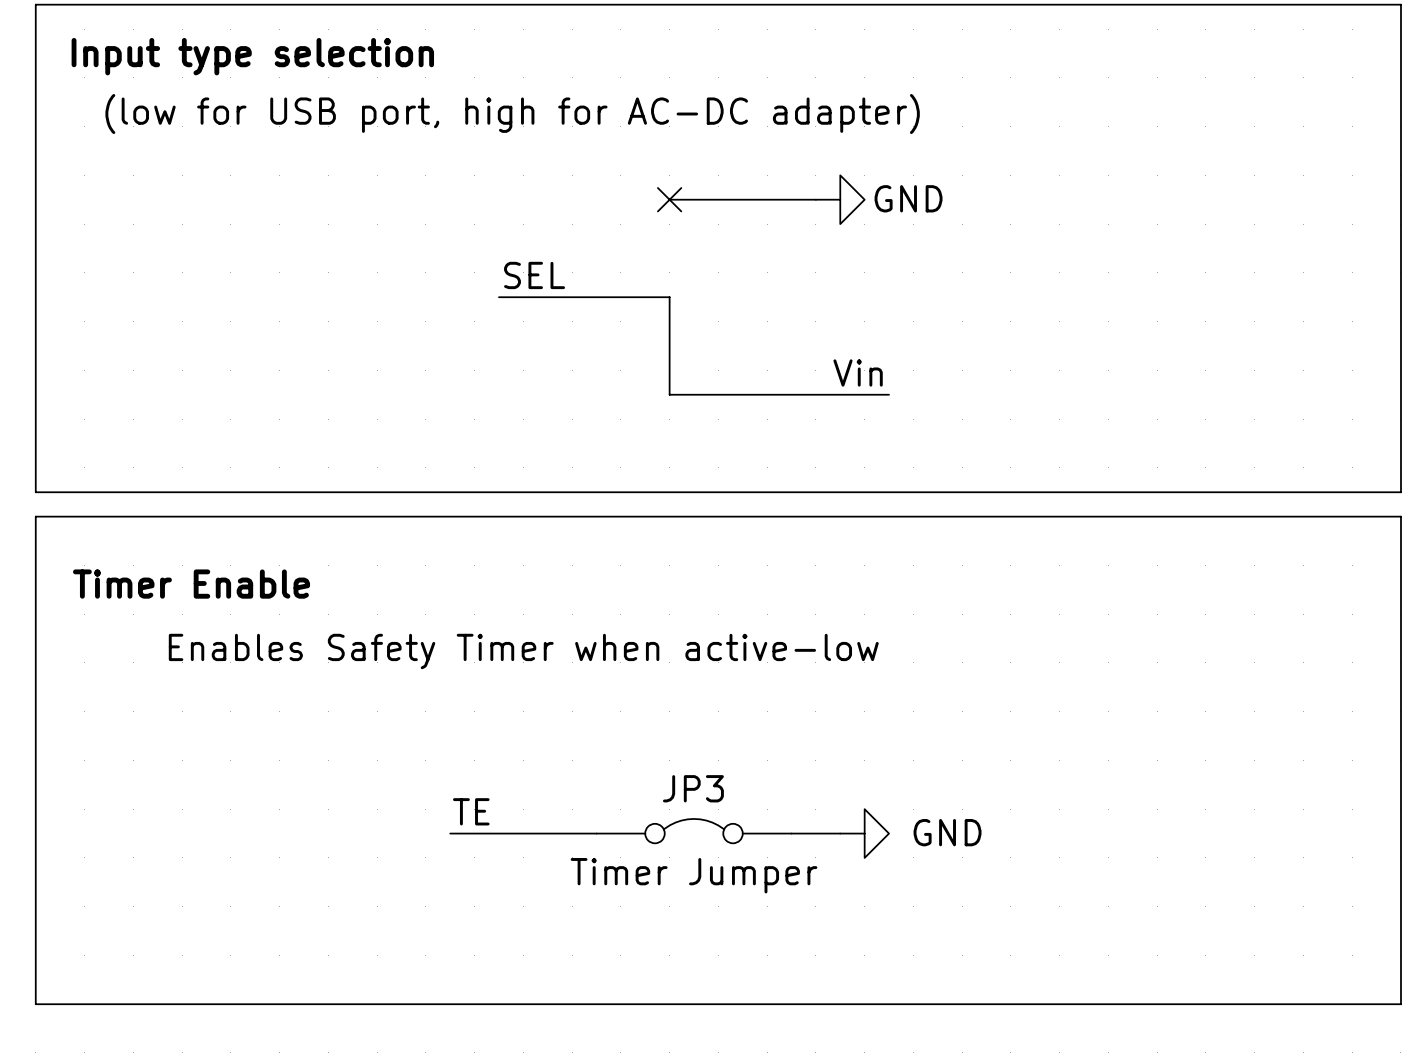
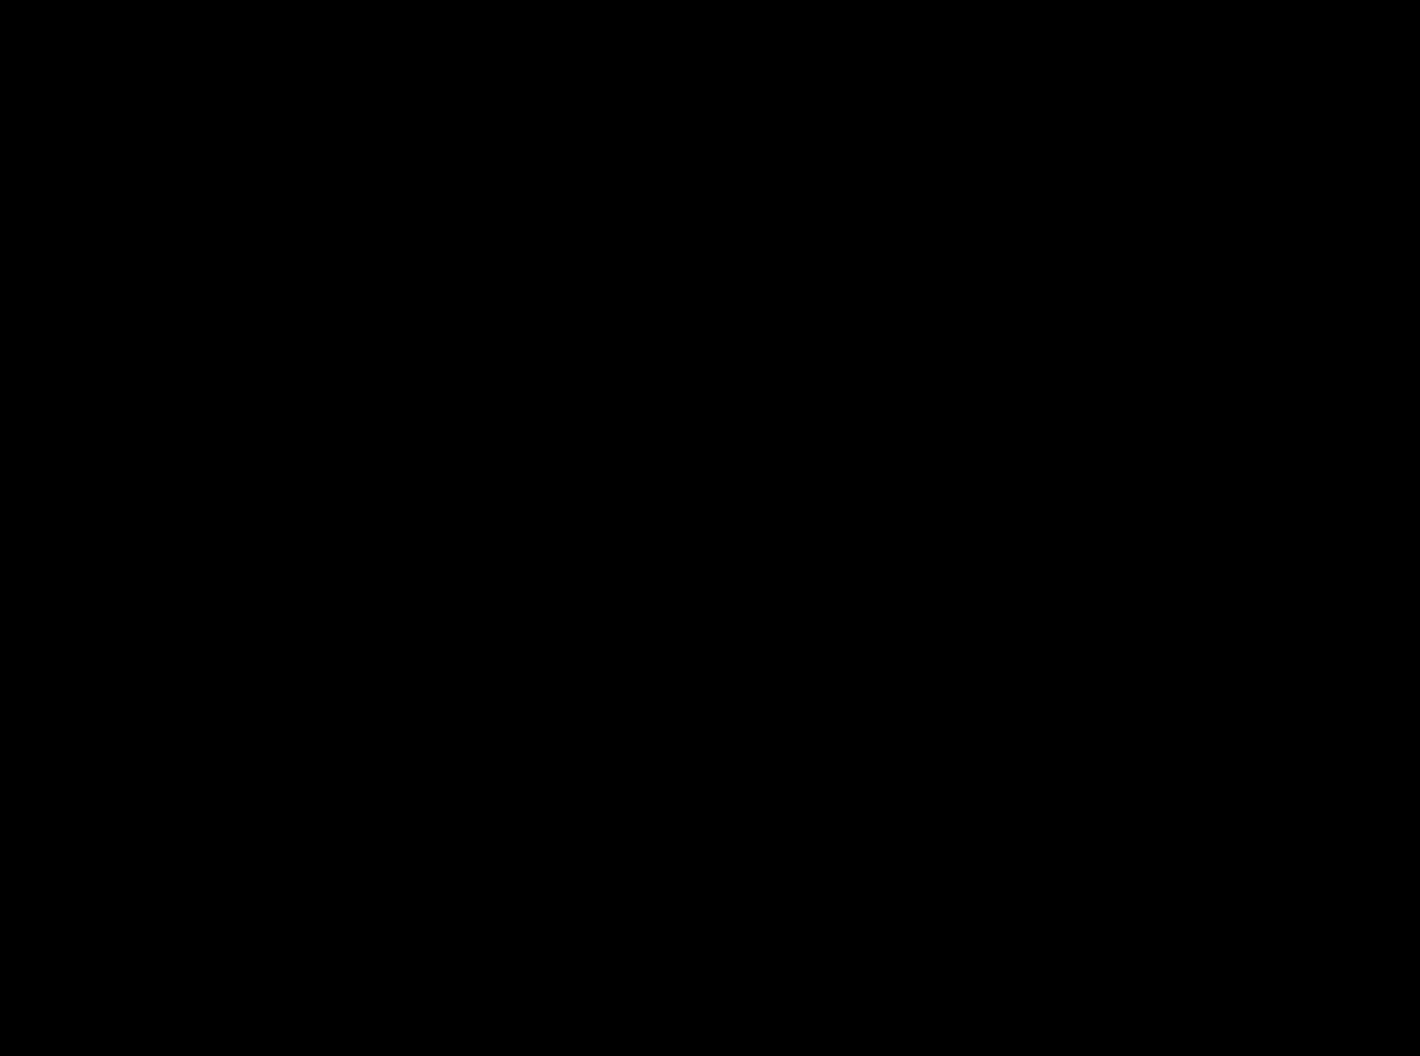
line: (35, 4) (1400, 4) (1400, 492) (35, 492) (35, 4) -> none
text: Input type selection (252, 56) -> none
text: (low for USB port, high for AC-DC adapter) (512, 114) -> none
wire: (669, 199) (815, 199) -> none
no-connect mark: (669, 199) -> none
power symbol: GND (840, 199) -> none
label: SEL (534, 275) -> none
wire: (498, 297) (669, 297) (669, 394) (889, 394) -> none
label: Vin (858, 372) -> none
line: (35, 516) (35, 1004) (1400, 1004) (1400, 516) (35, 516) -> none
text: Timer Enable (191, 584) -> none
text: Enables Safety Timer when active-low (523, 651) -> none
label: TE (471, 811) -> none
JP3: Timer Jumper (694, 831) -> none
wire: (450, 833) (596, 833) -> none
wire: (791, 833) (840, 833) -> none
power symbol: GND (864, 833) -> none

